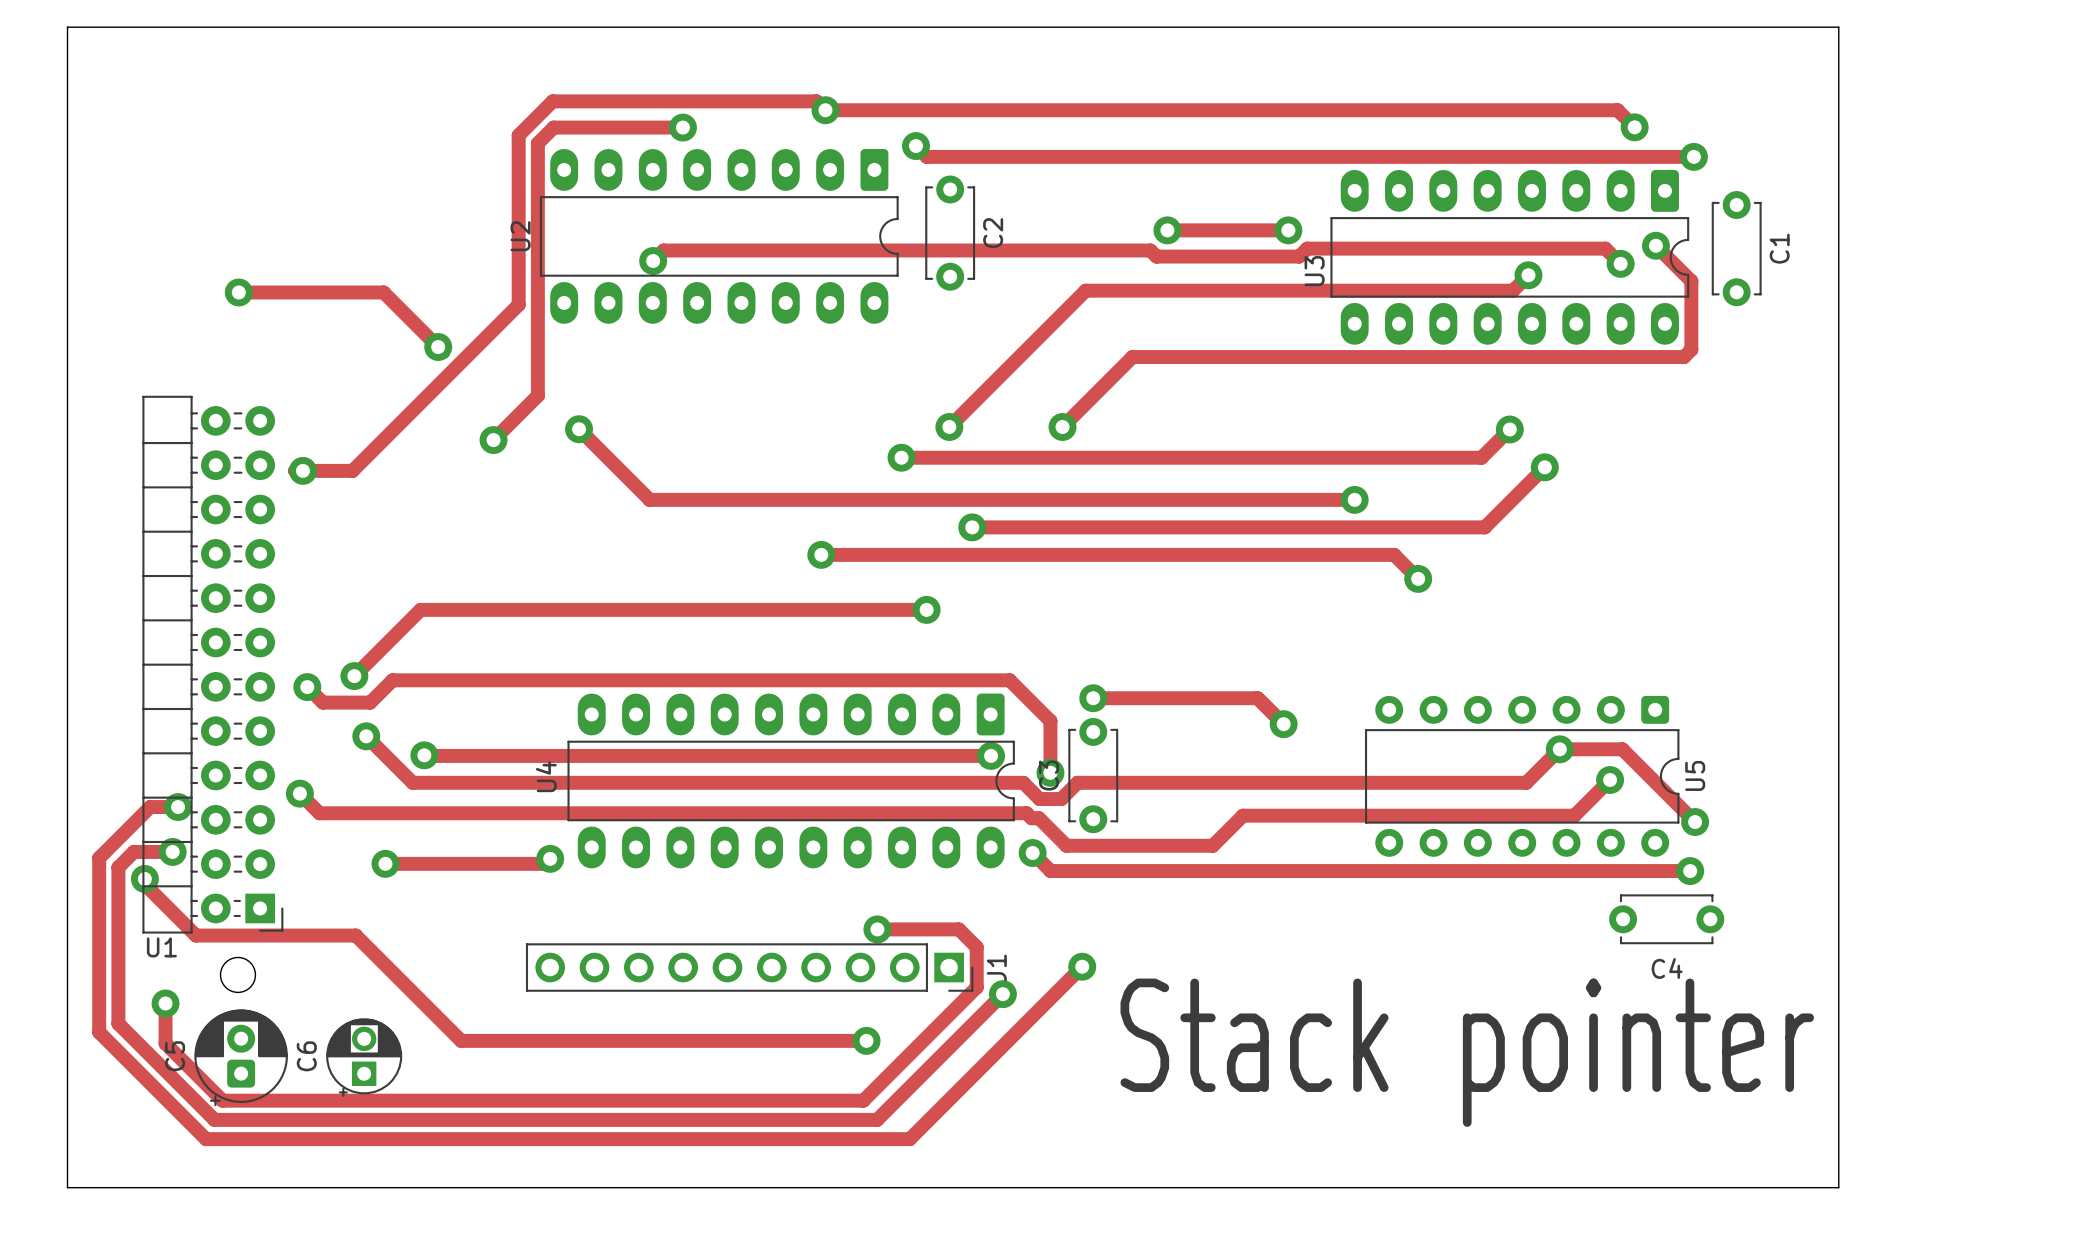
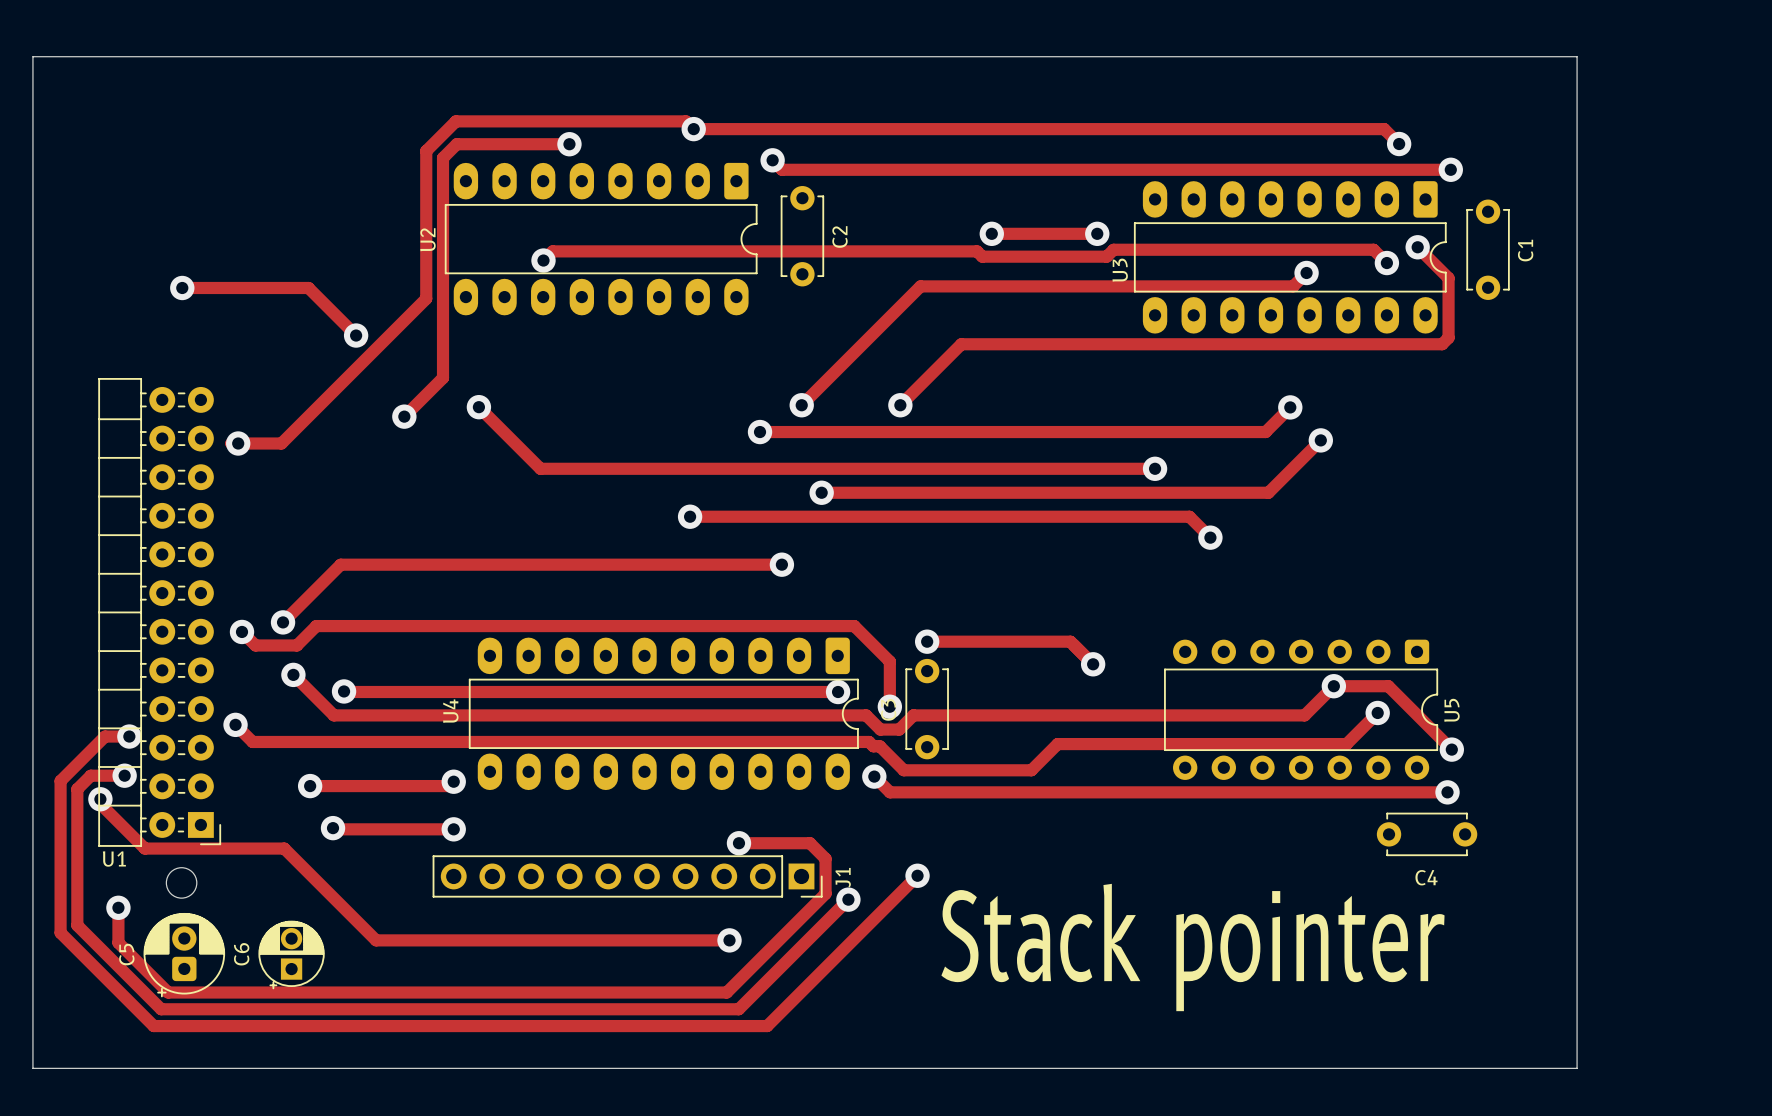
via: none -> (333, 828)
track: none -> (336, 828) (453, 829)
via: none -> (453, 829)

